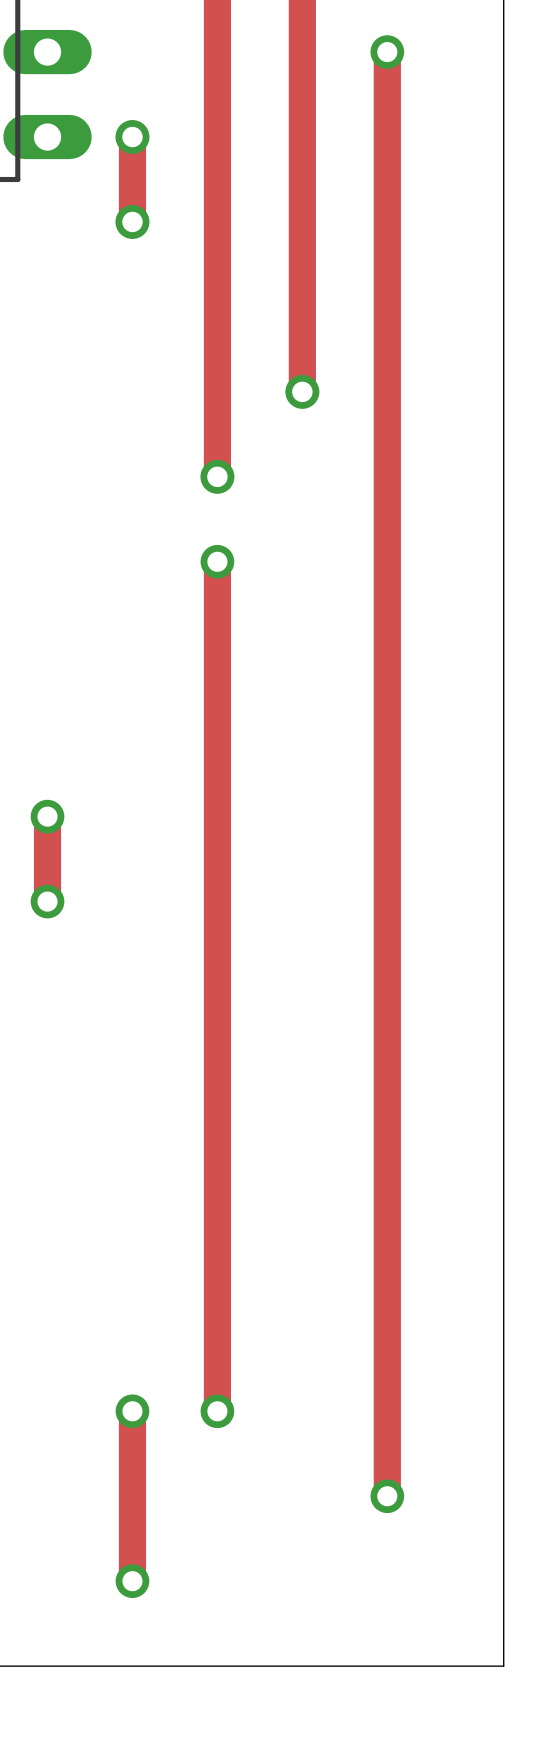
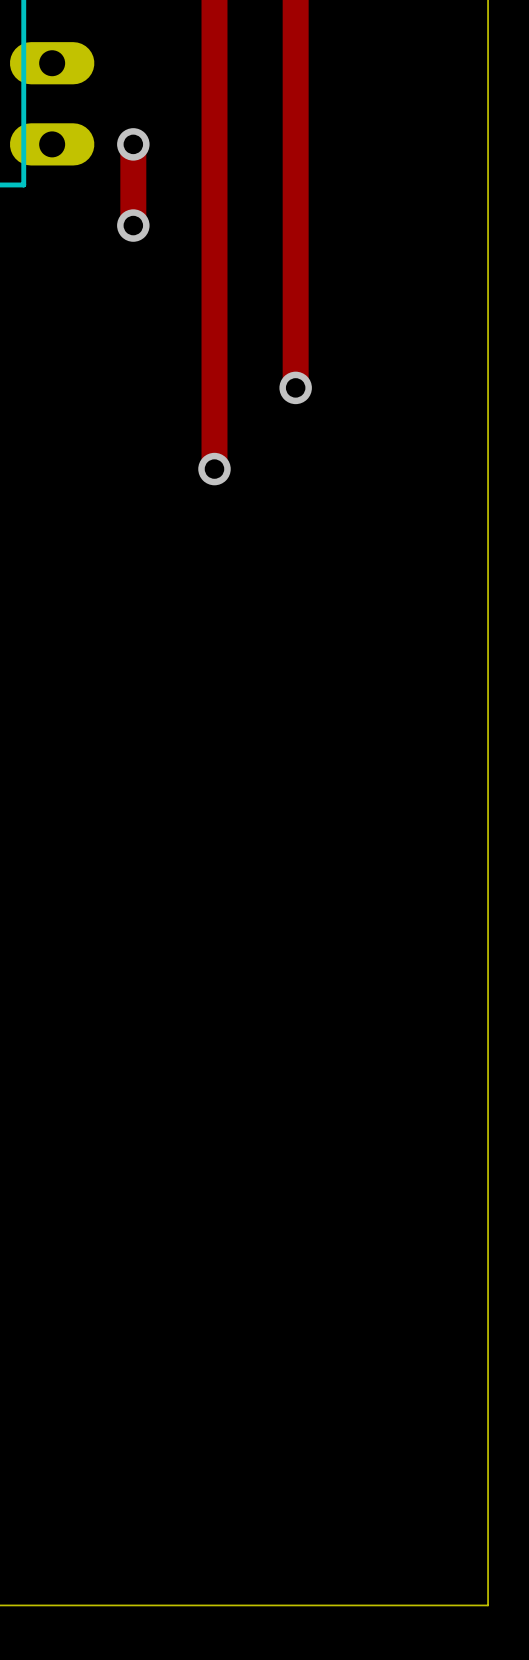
track: (387, 52) (387, 1496) -> none
via: (387, 52) -> none
track: (217, 561) (217, 1411) -> none
via: (217, 561) -> none
track: (47, 816) (47, 901) -> none
via: (47, 816) -> none
via: (47, 901) -> none
track: (132, 1411) (132, 1581) -> none
via: (132, 1411) -> none
via: (217, 1411) -> none
via: (387, 1496) -> none
via: (132, 1581) -> none

